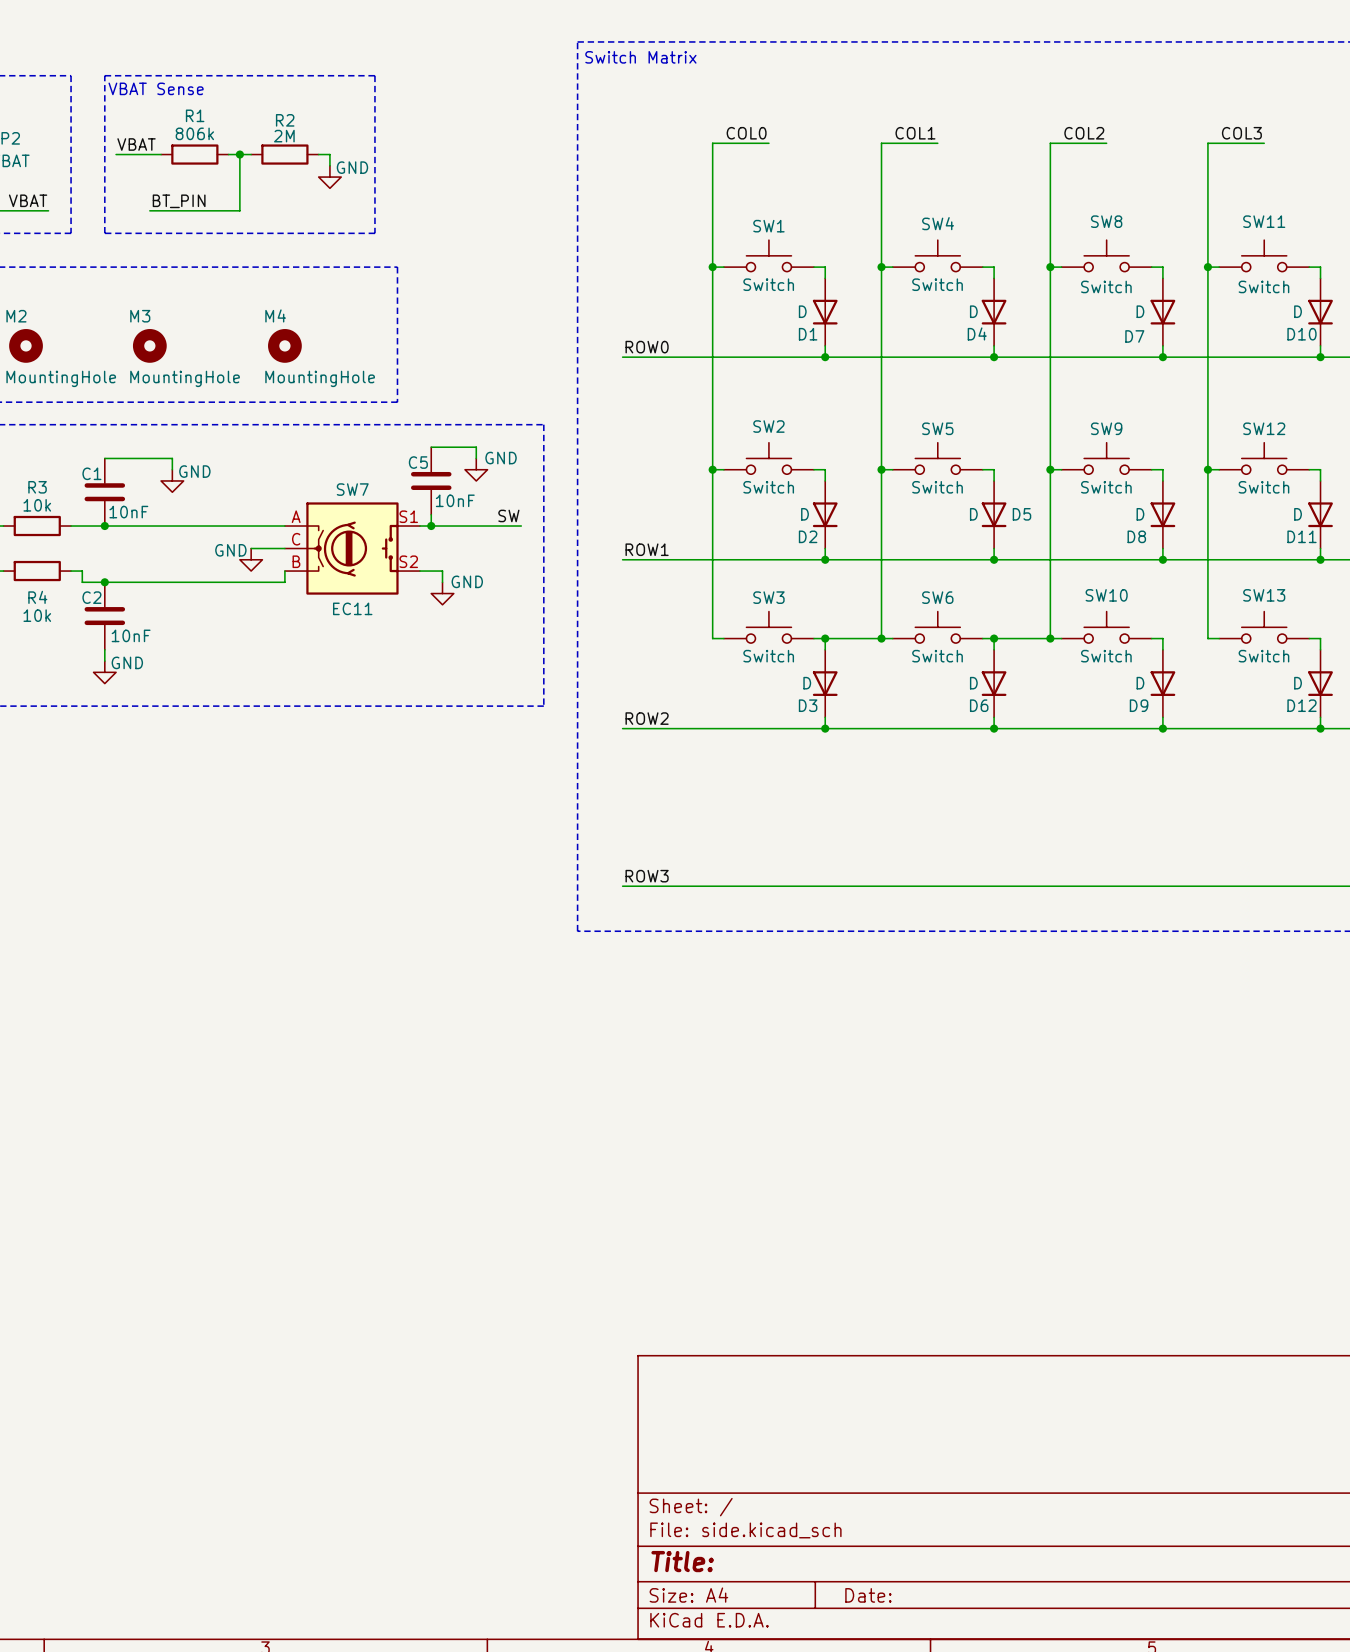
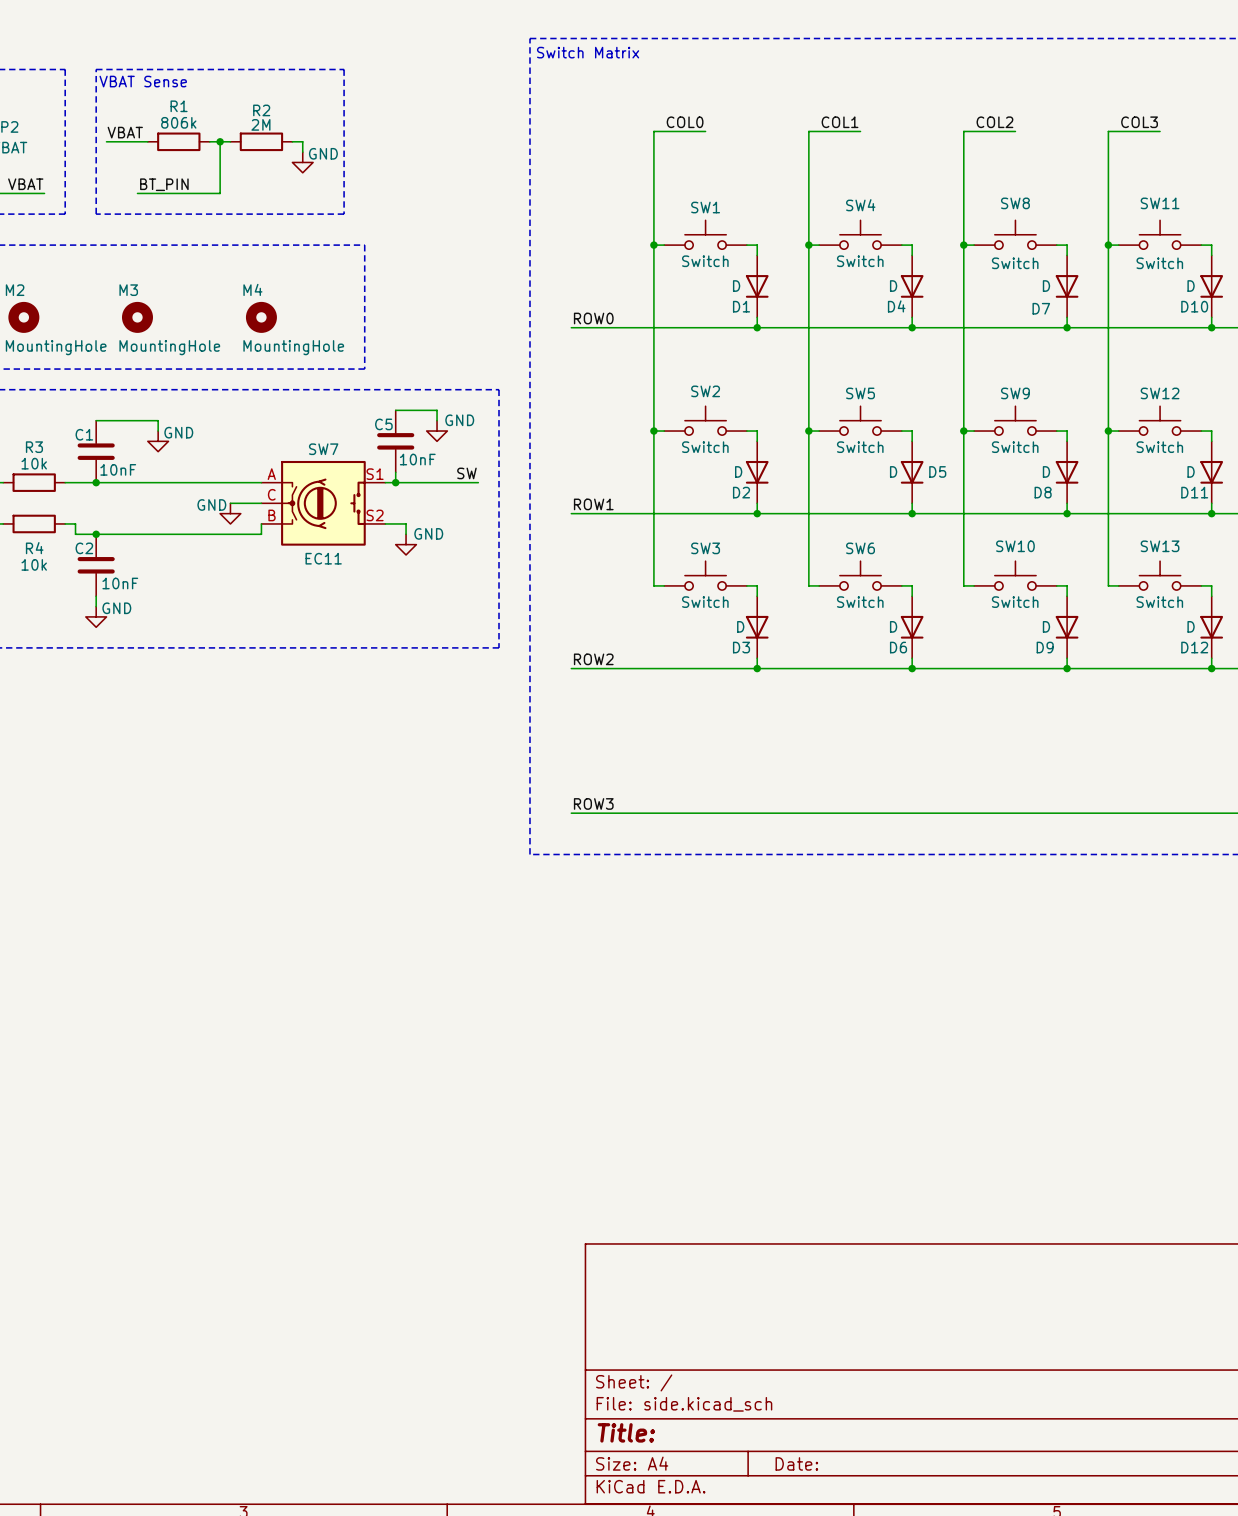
wire: (825, 638) (881, 638) -> none
junction: (825, 638) -> none
junction: (881, 638) -> none
wire: (994, 638) (1050, 638) -> none
junction: (994, 638) -> none
junction: (1050, 638) -> none

